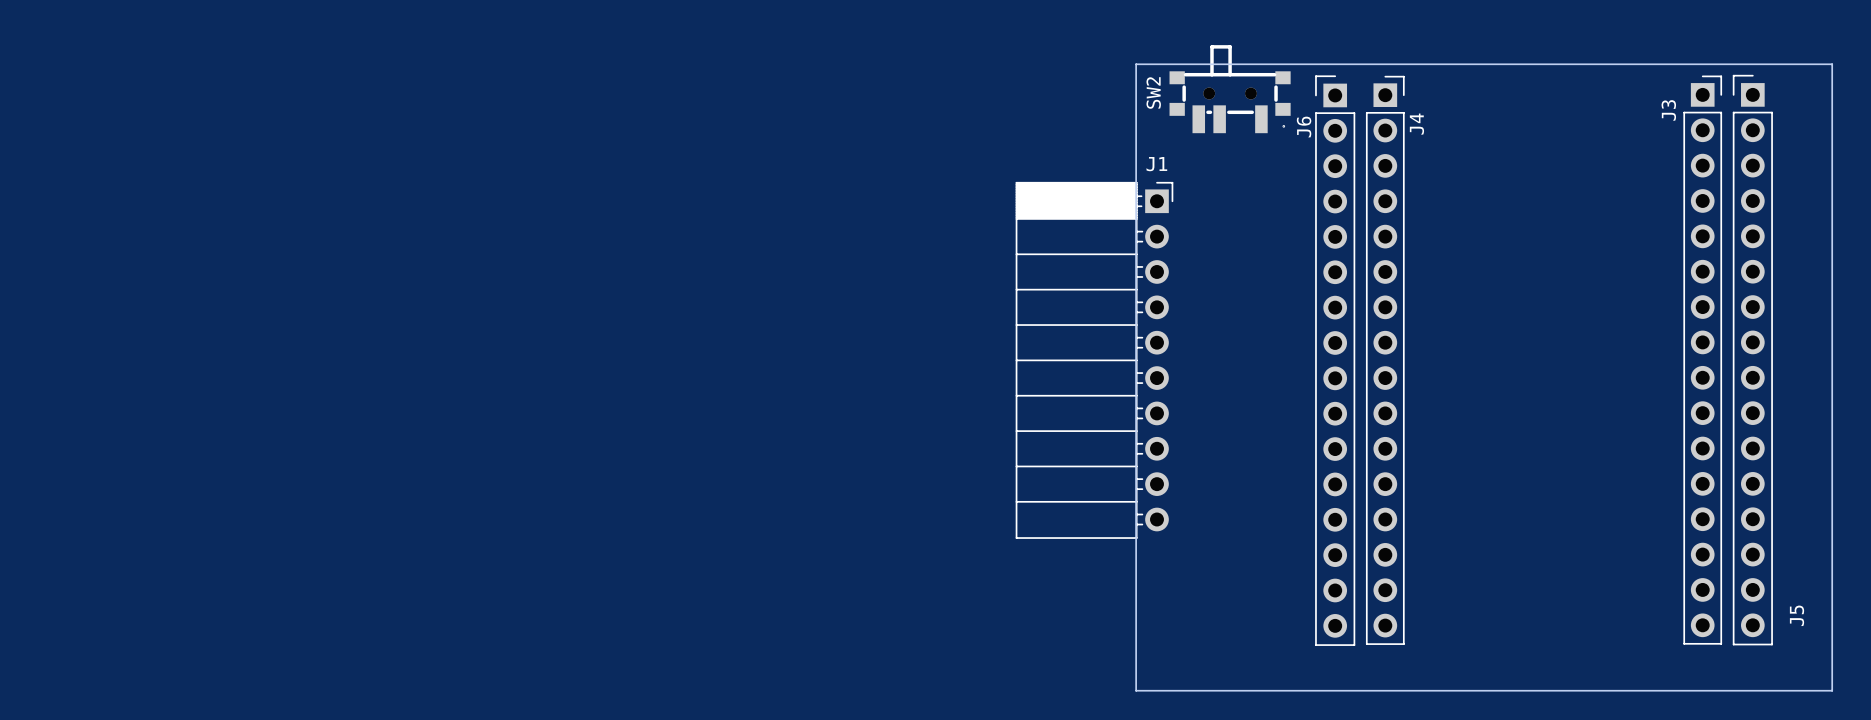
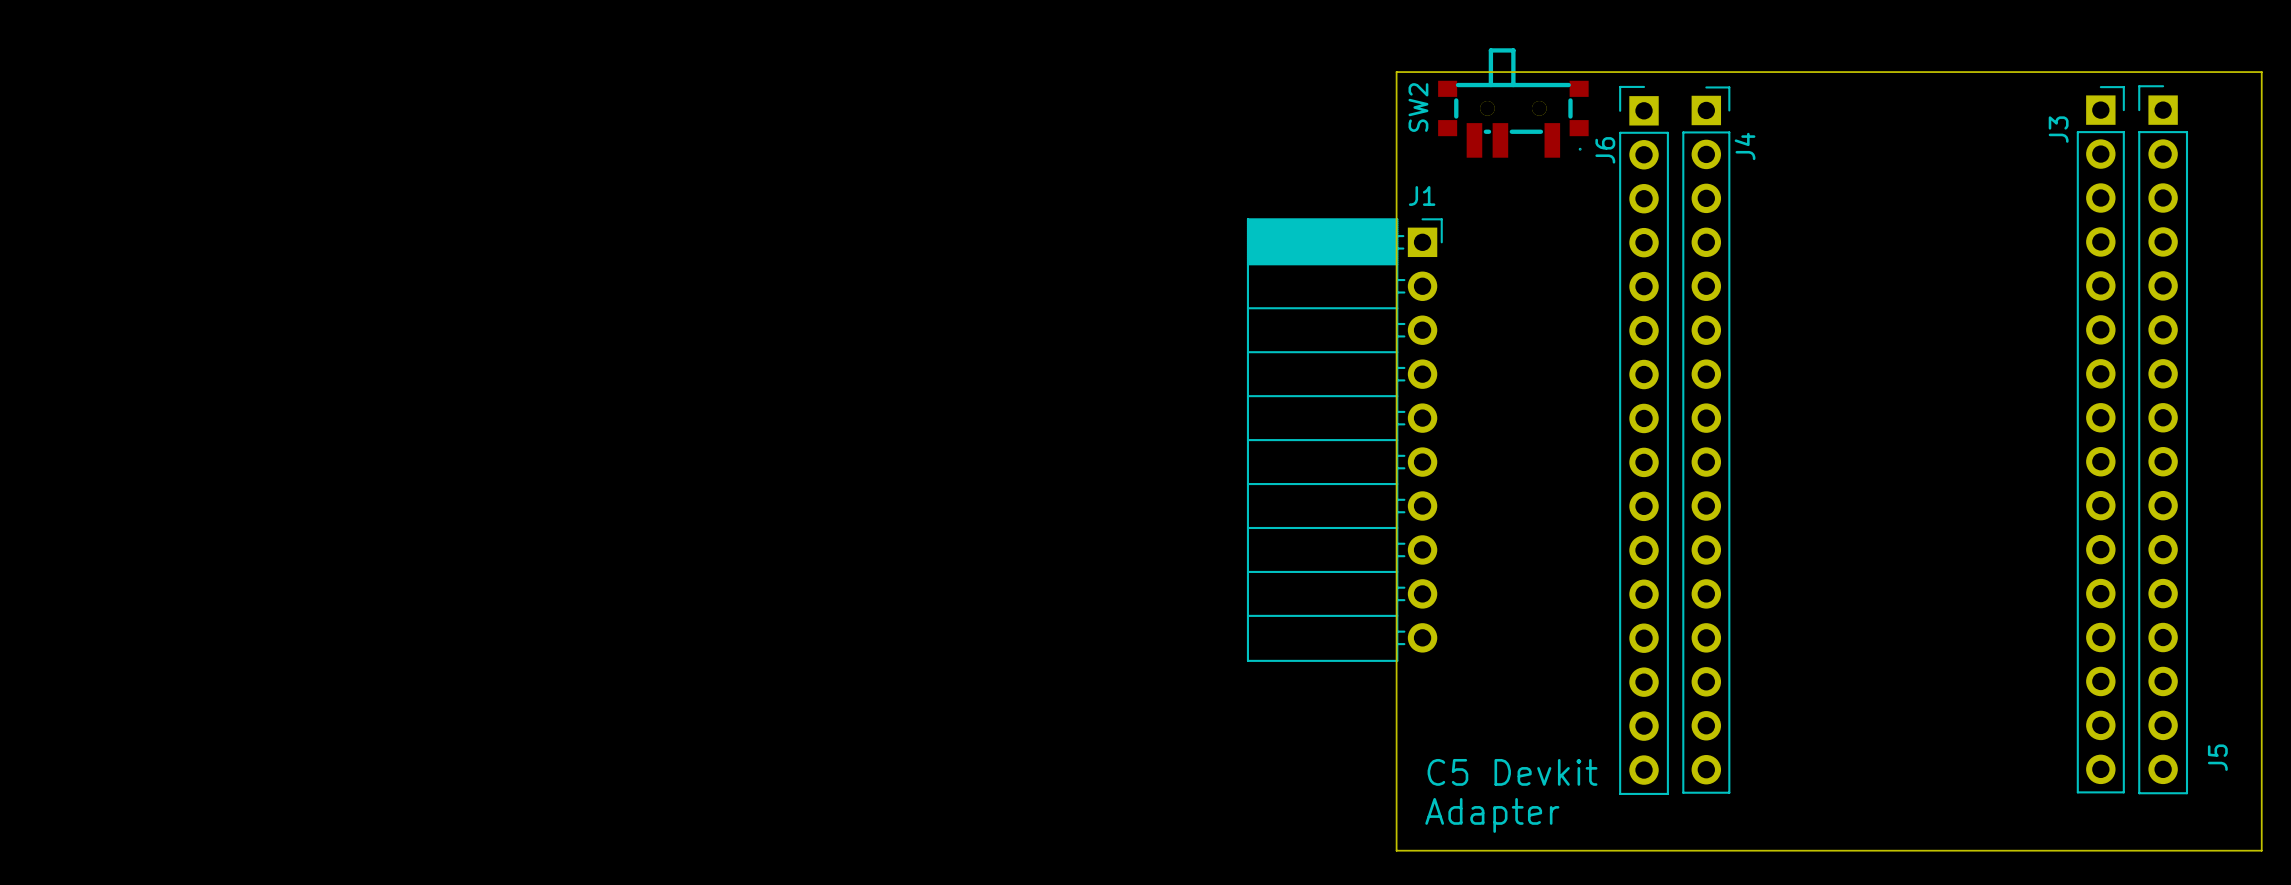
text: none -> C5 Devkit (1512, 772)
text: none -> Adapter (1492, 815)

